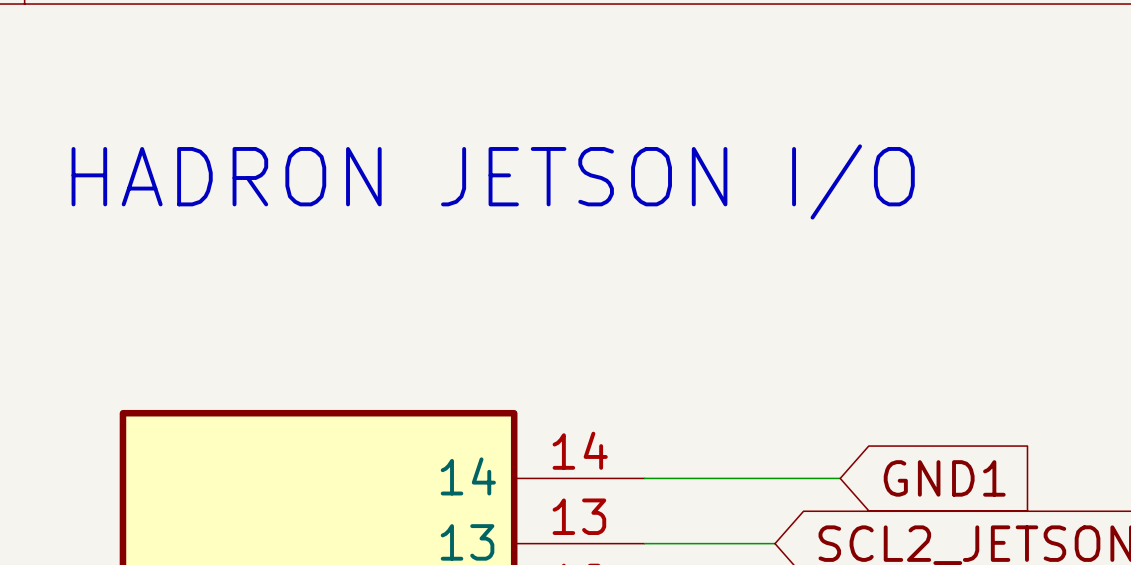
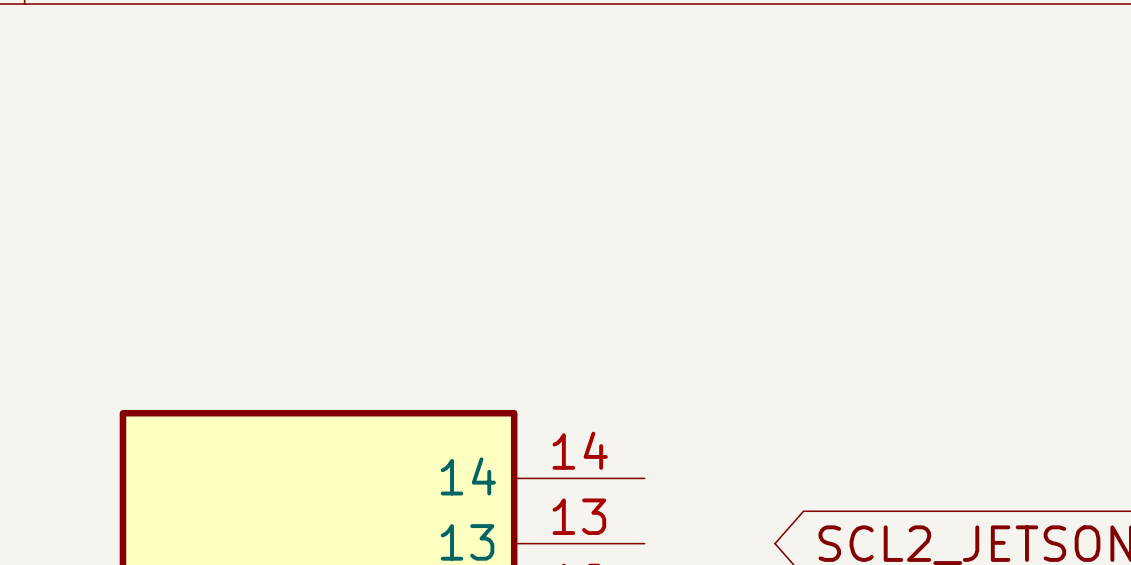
text: HADRON JETSON I/O (493, 181) -> none
wire: (644, 478) (840, 478) -> none
global label: GND1 (944, 478) -> none
wire: (644, 543) (775, 543) -> none

